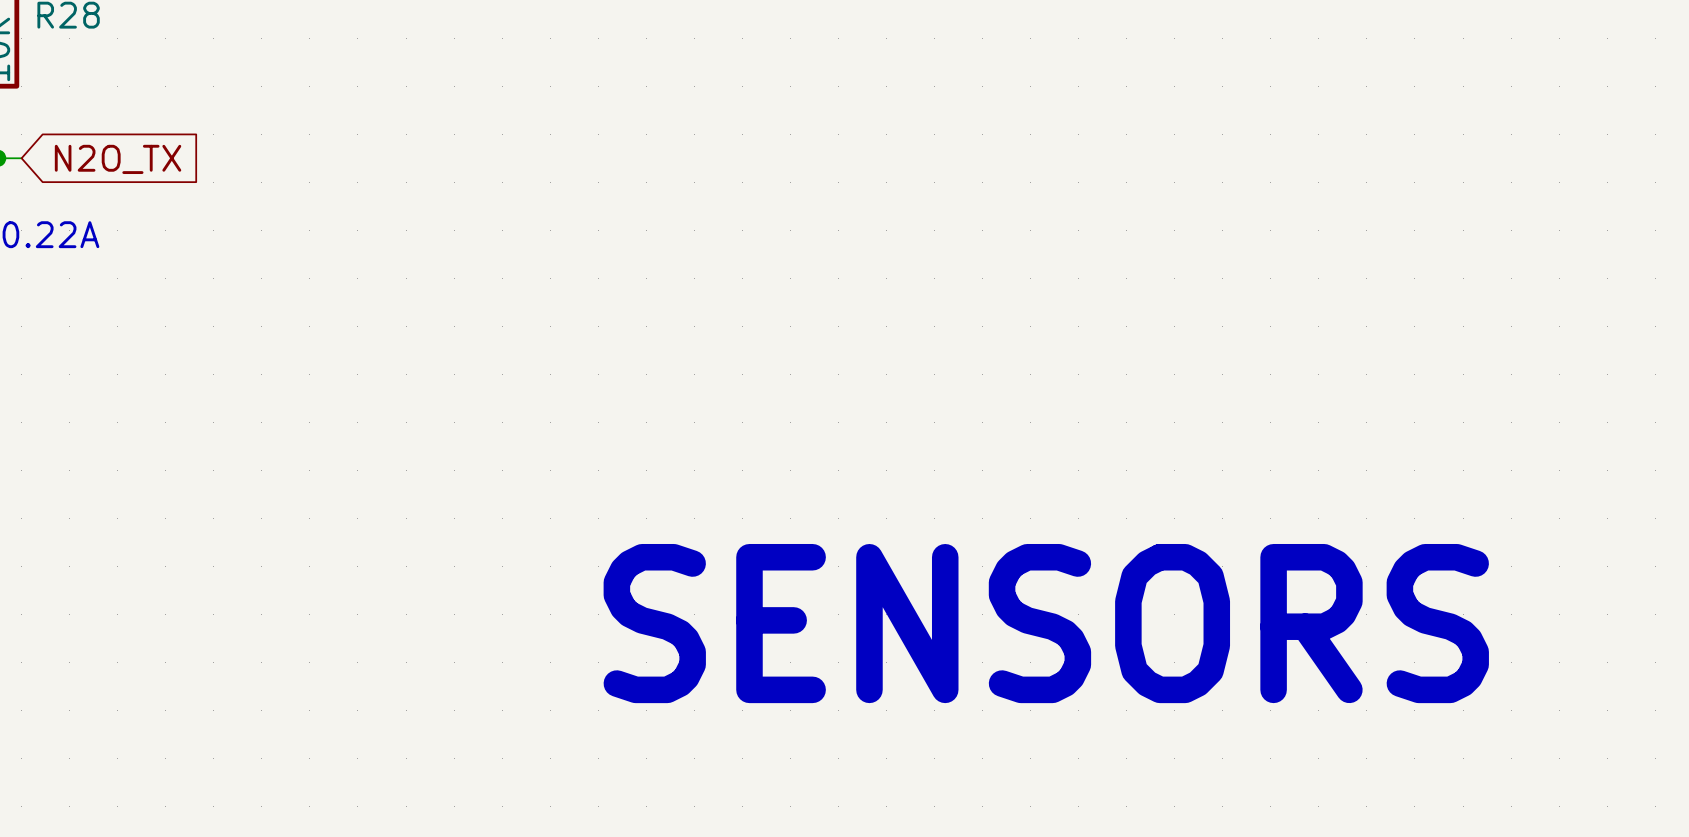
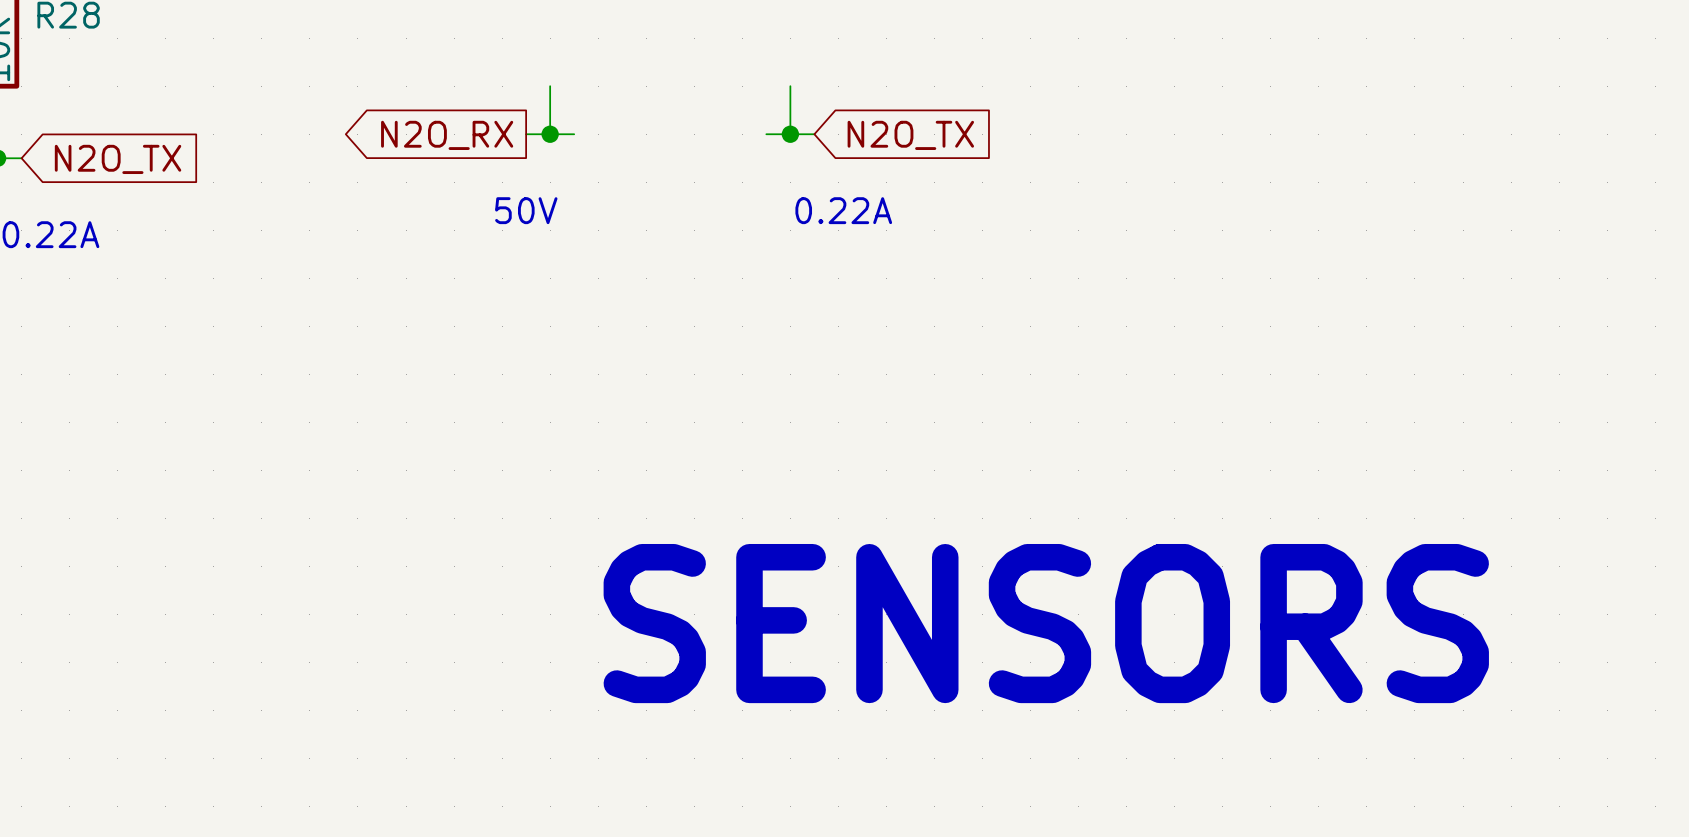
wire: none -> (550, 86) (550, 134)
wire: none -> (790, 86) (790, 134)
wire: none -> (526, 134) (574, 134)
junction: none -> (550, 134)
wire: none -> (766, 134) (814, 134)
junction: none -> (790, 134)
global label: none -> N2O_RX (447, 135)
global label: none -> N2O_TX (910, 135)
text: none -> 50V (526, 210)
text: none -> 0.22A (843, 210)

